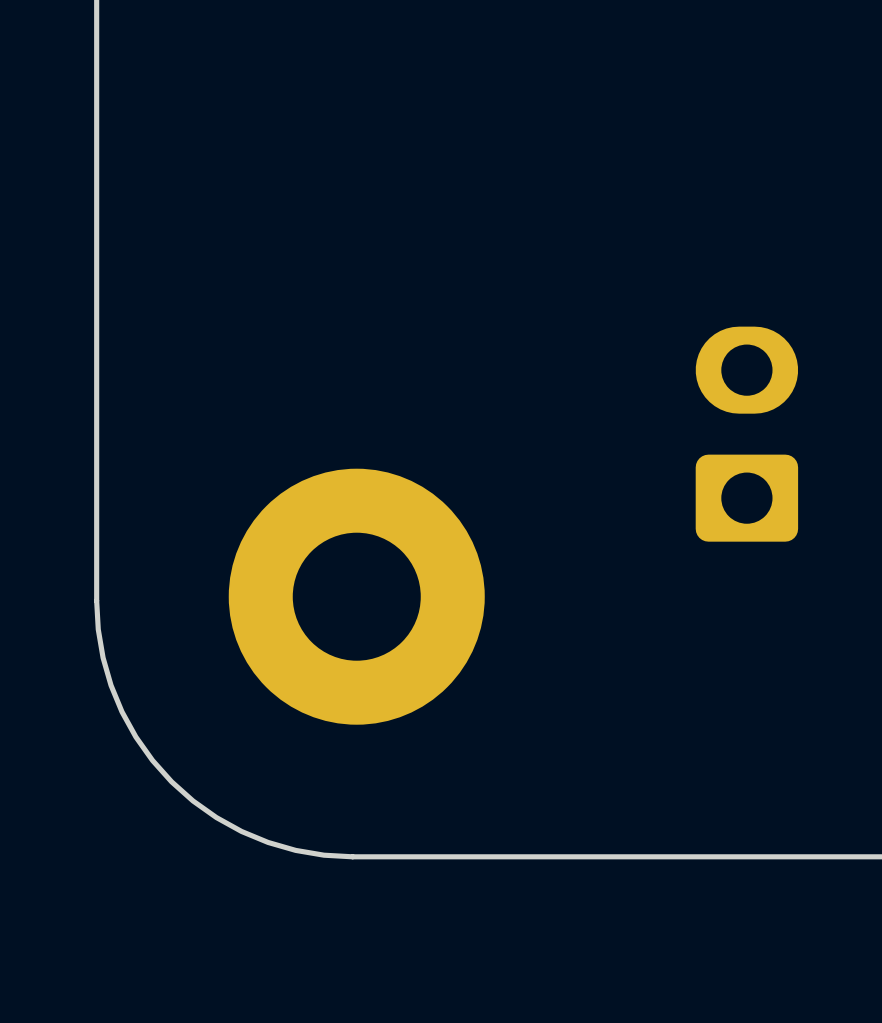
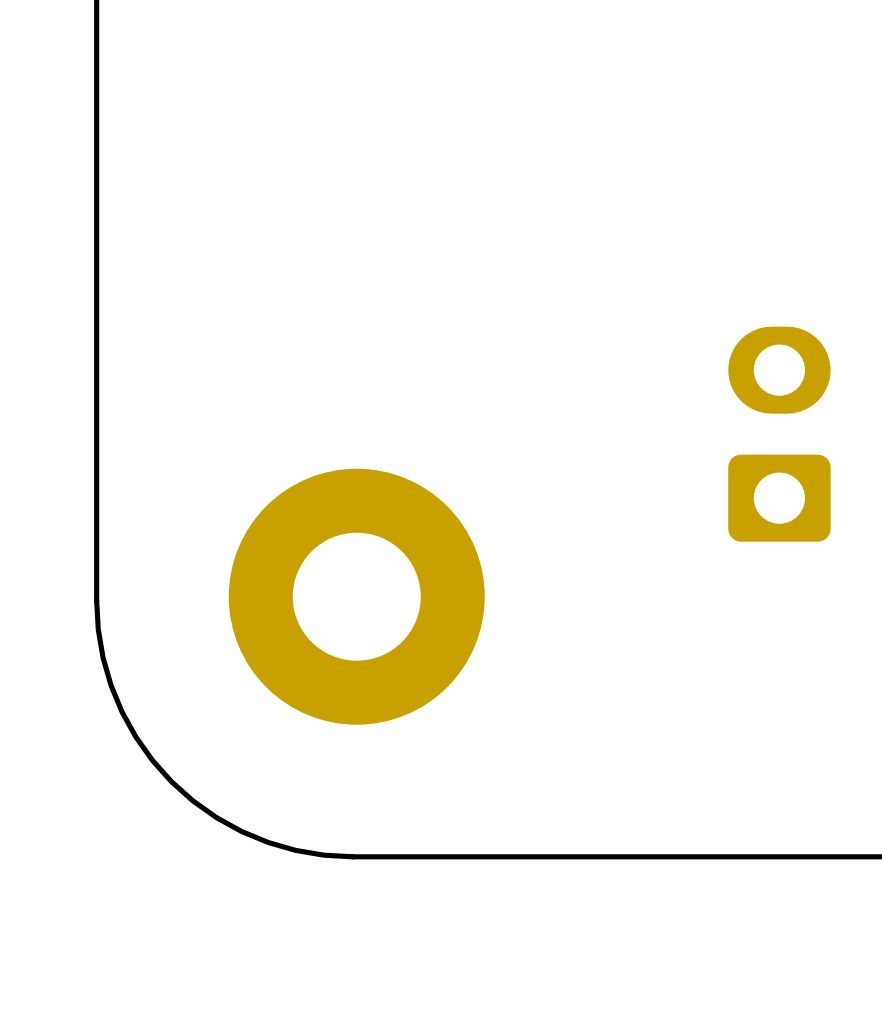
part position: (746, 434) -> (779, 434)

